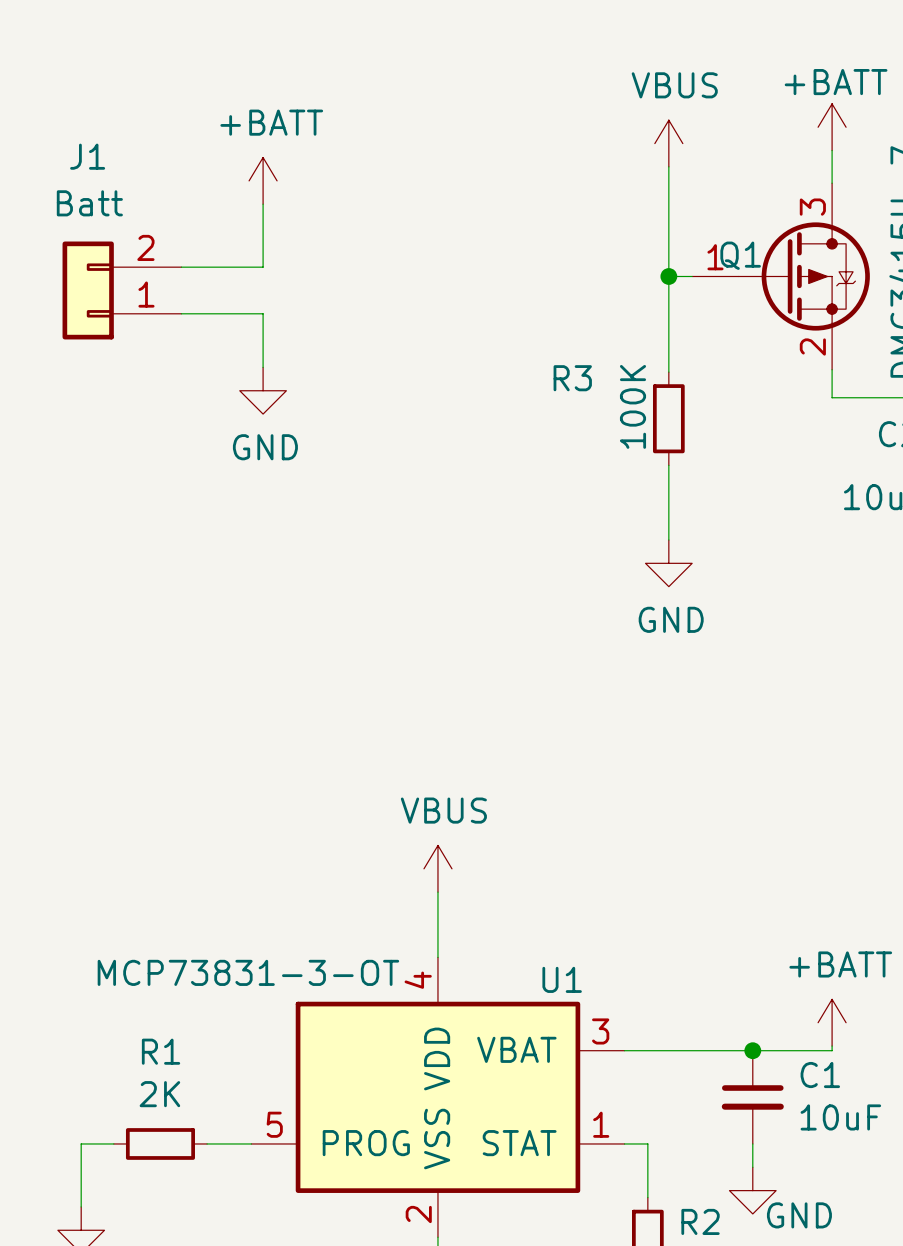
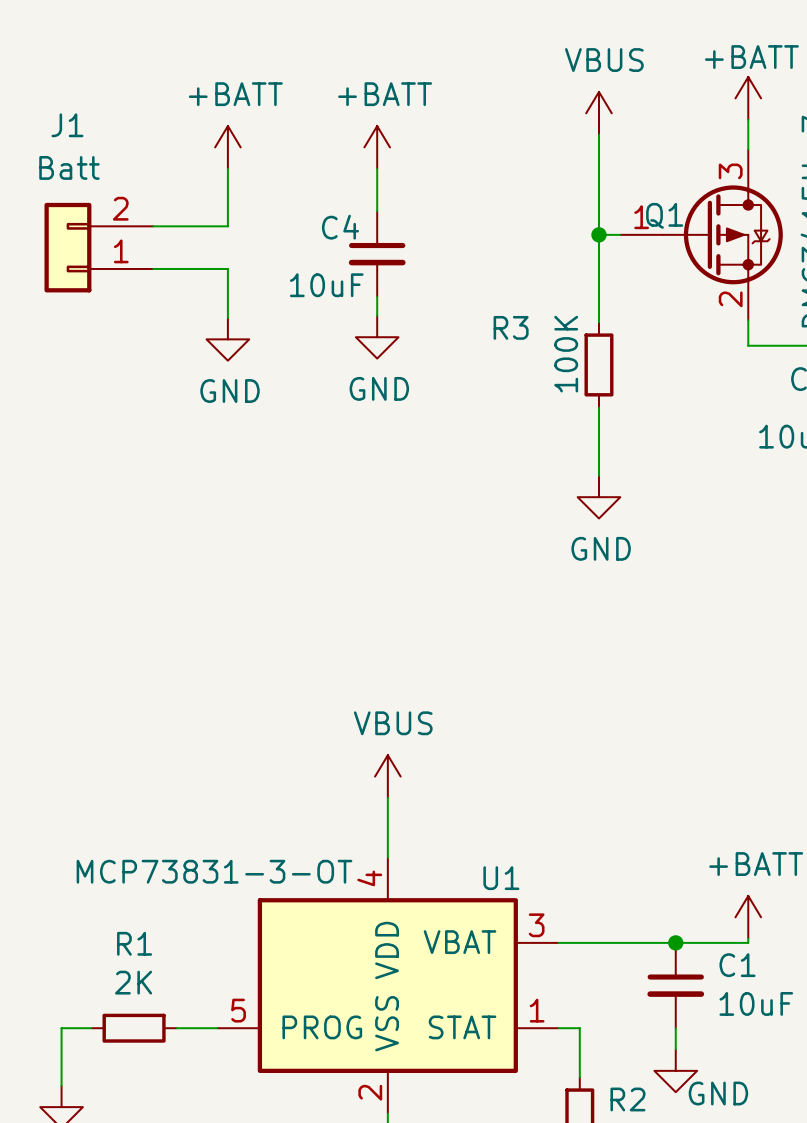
power symbol: none -> +BATT (377, 147)
wire: none -> (377, 168) (377, 211)
C4: none -> 10uF (377, 254)
wire: none -> (377, 296) (377, 315)
power symbol: none -> GND (377, 337)

